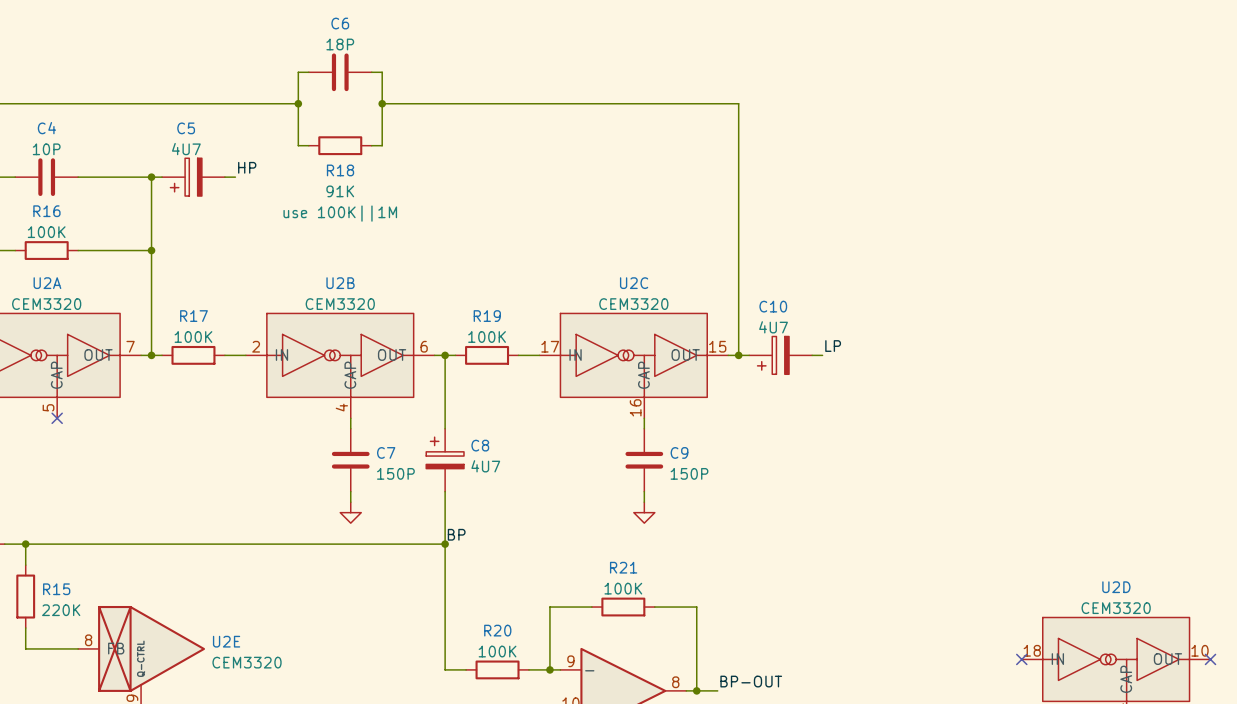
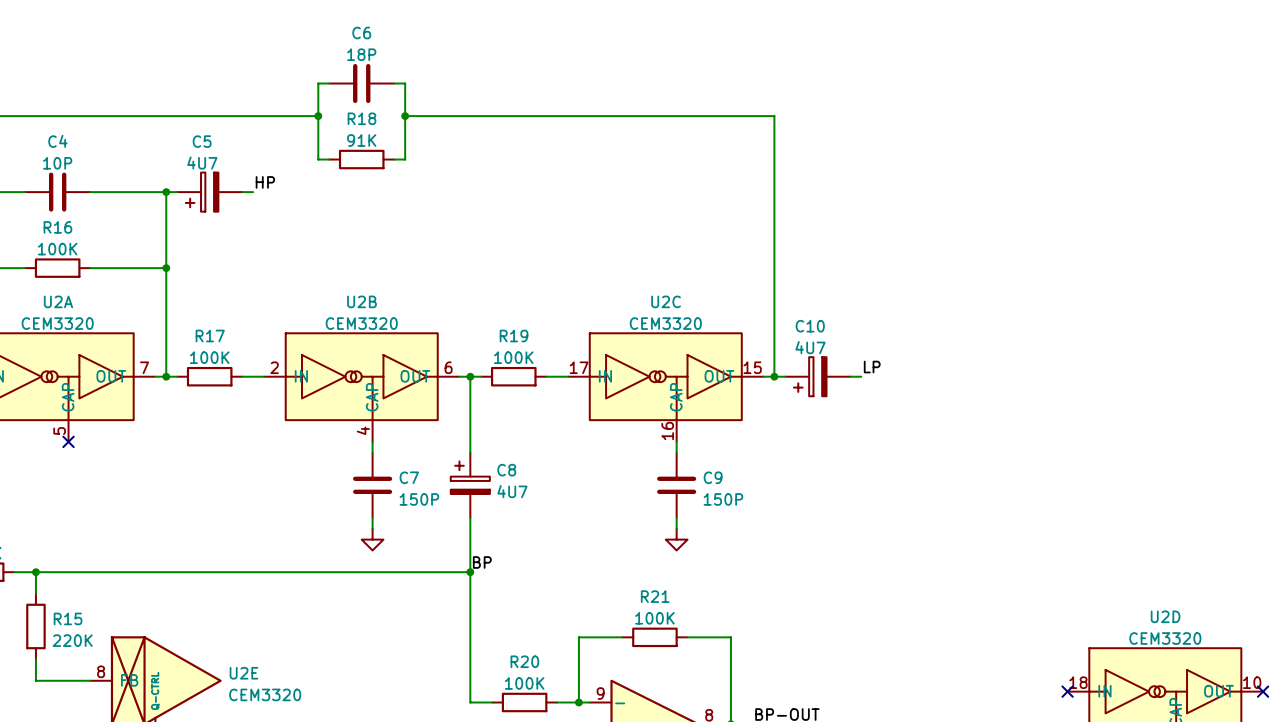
R18 name position: R18 (340, 170) -> R18 (361, 118)
R18 value position: 91K (340, 191) -> 91K (361, 140)
R18 text: use 100K||1M (340, 213) -> none

